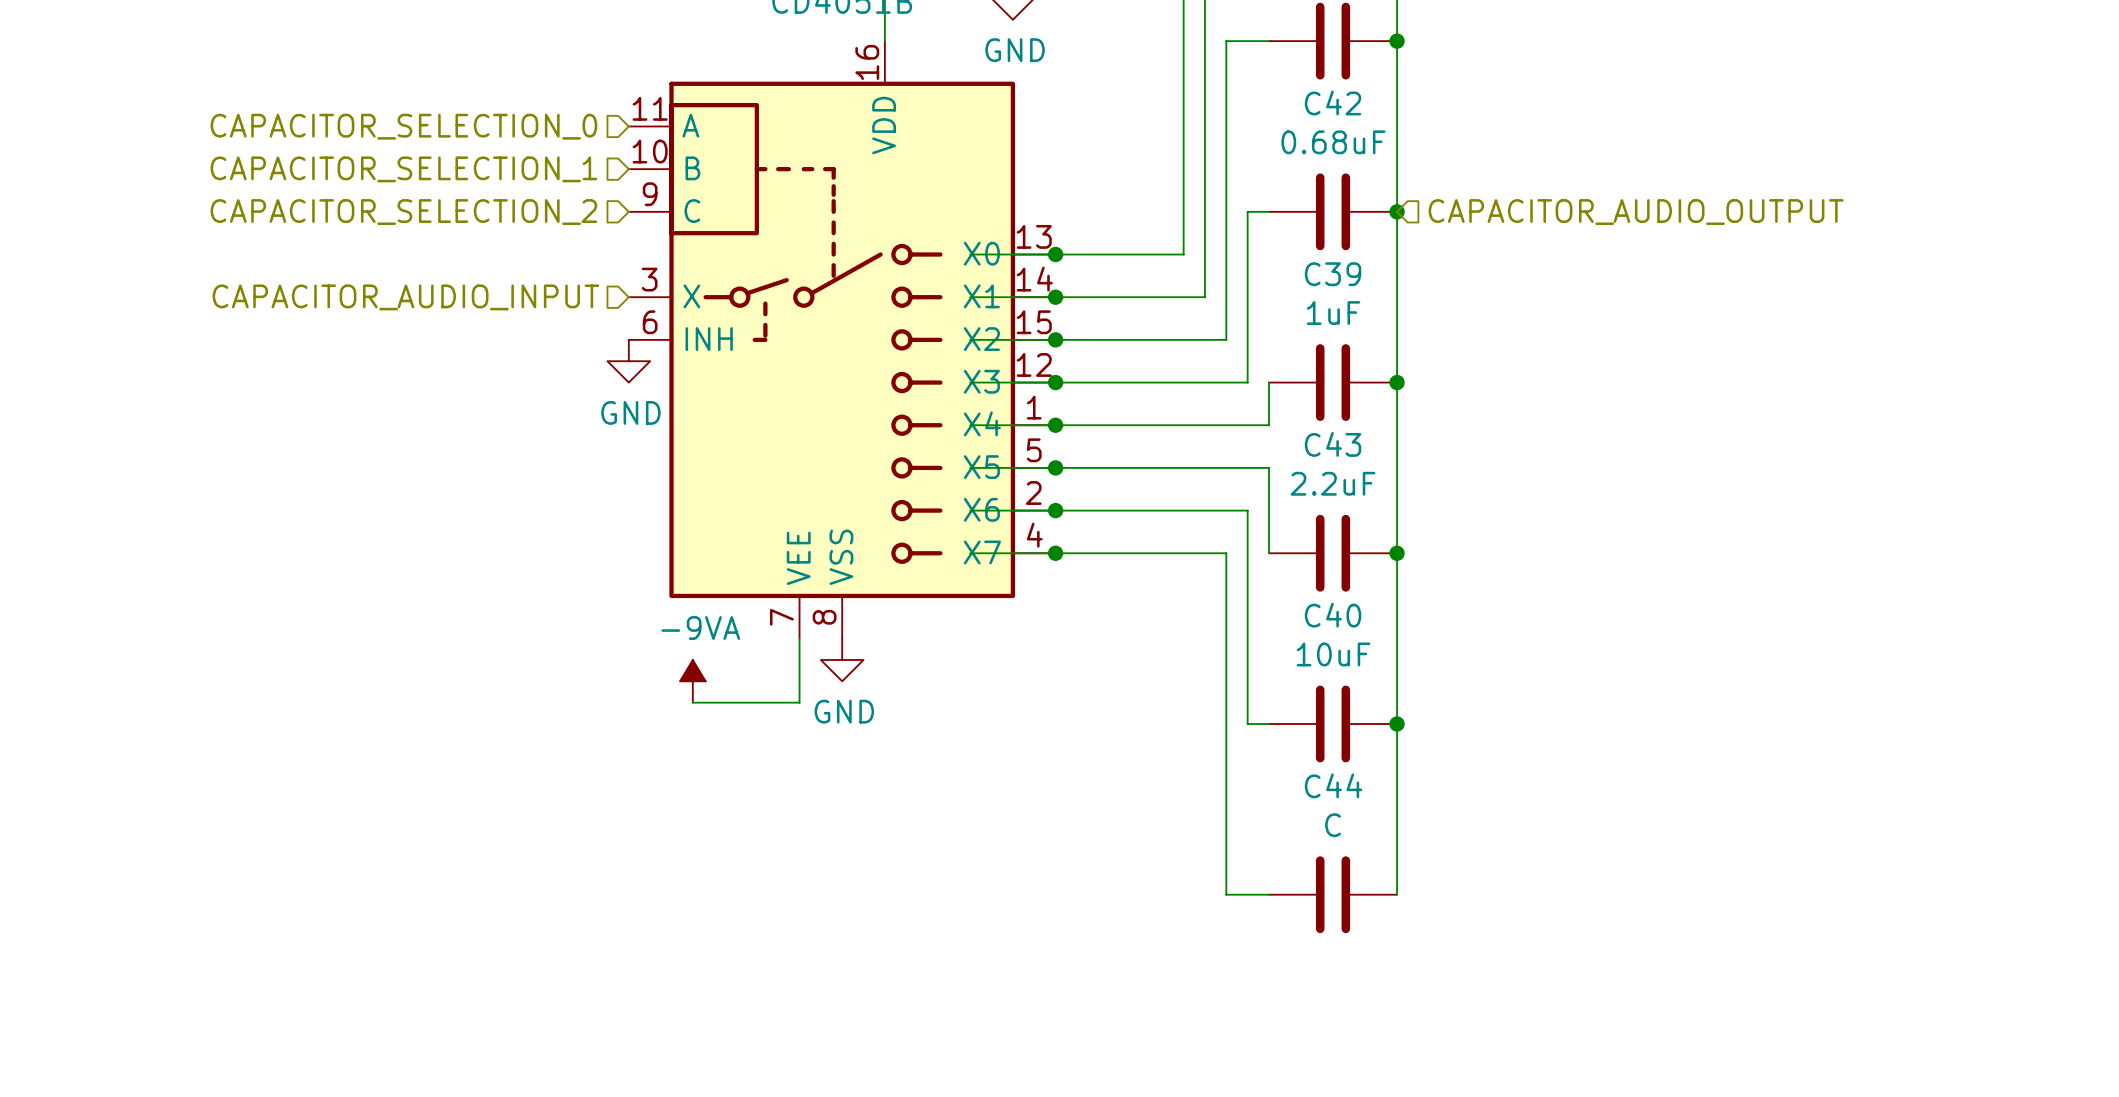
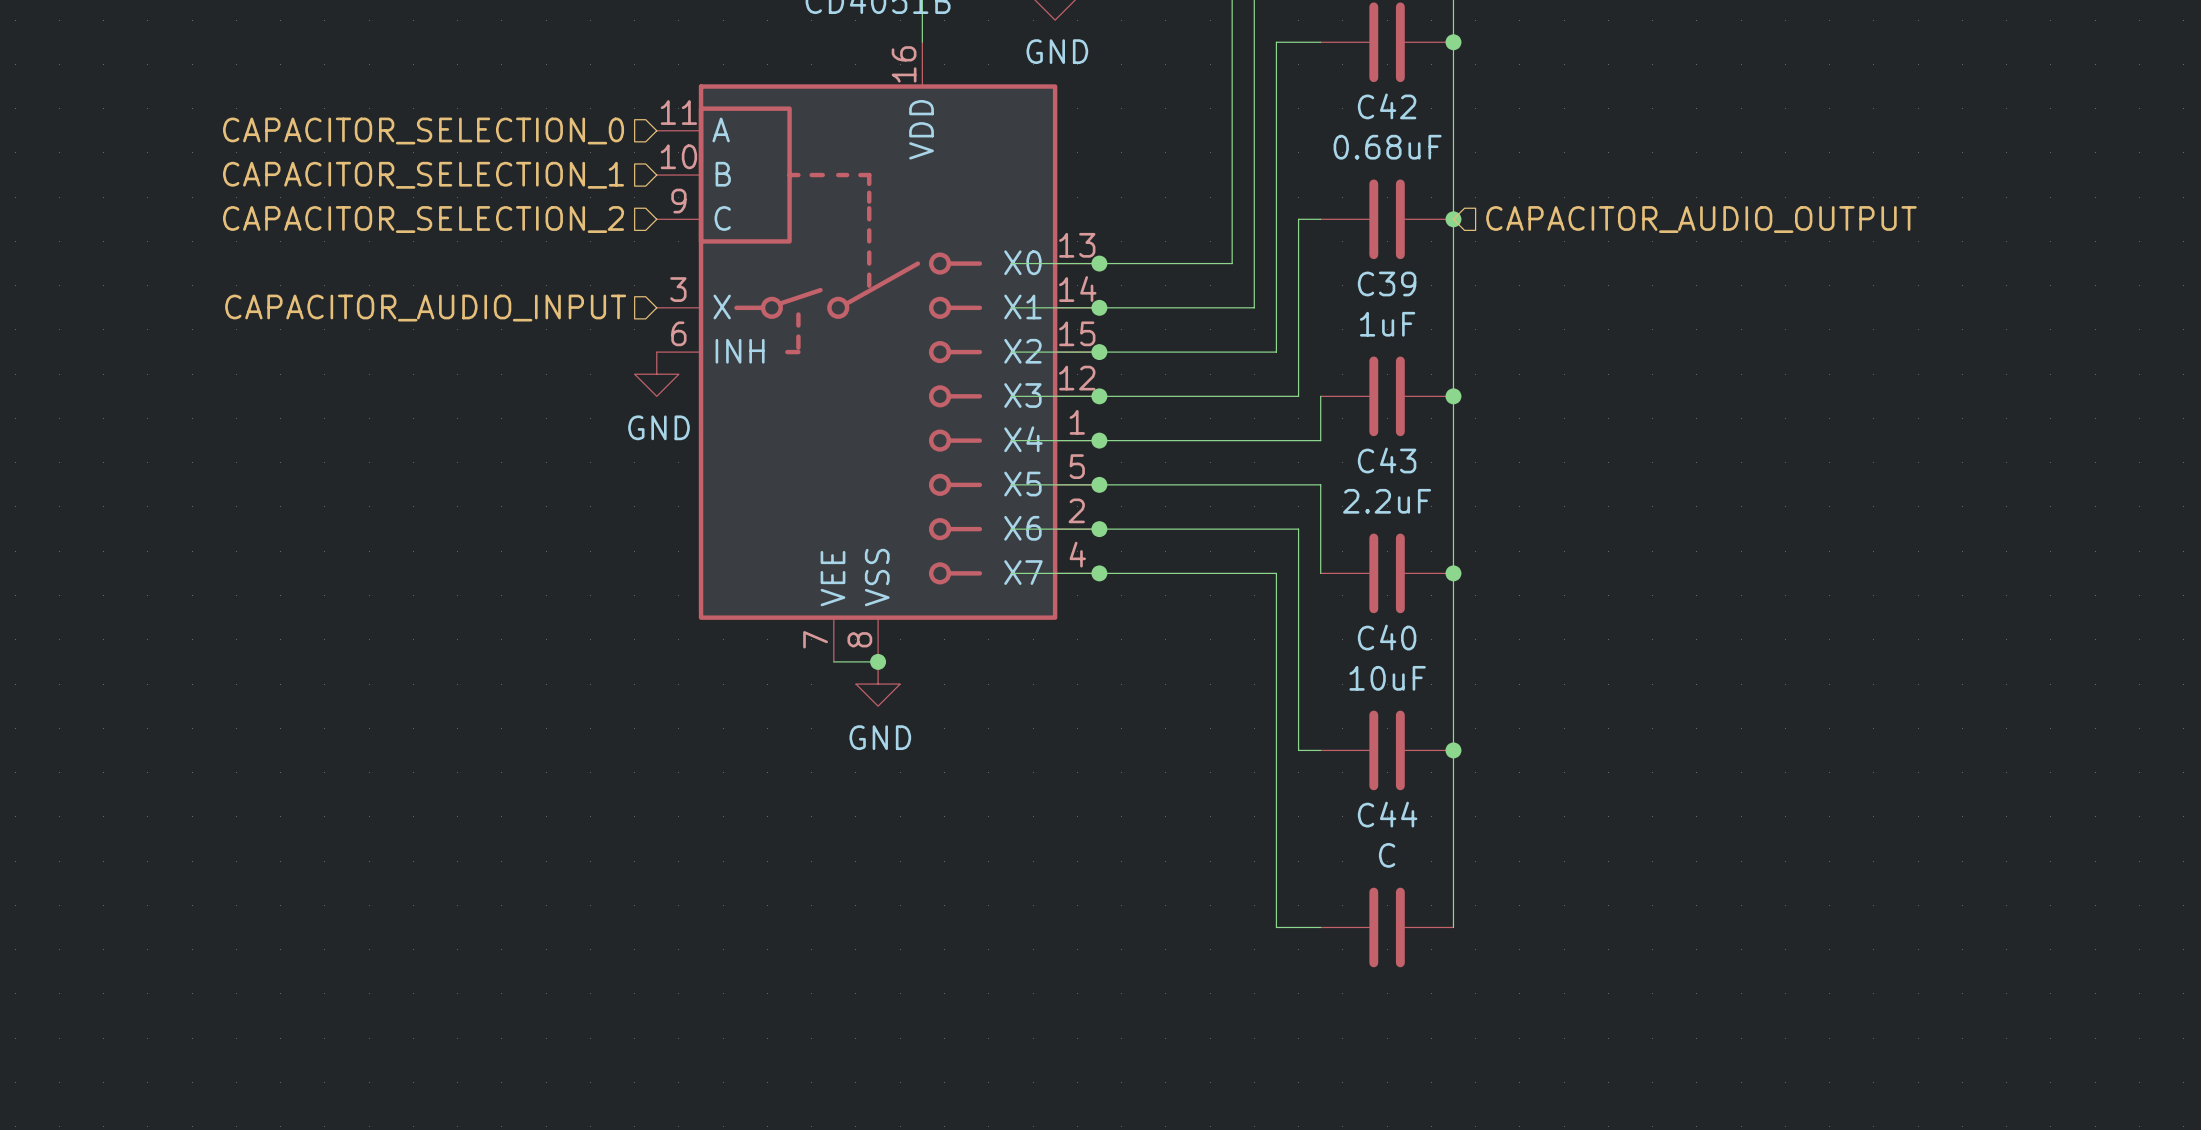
wire: (799, 638) (799, 702) (692, 702) -> (833, 661) (878, 661)
junction: none -> (878, 661)
power symbol: -9VA (692, 681) -> none

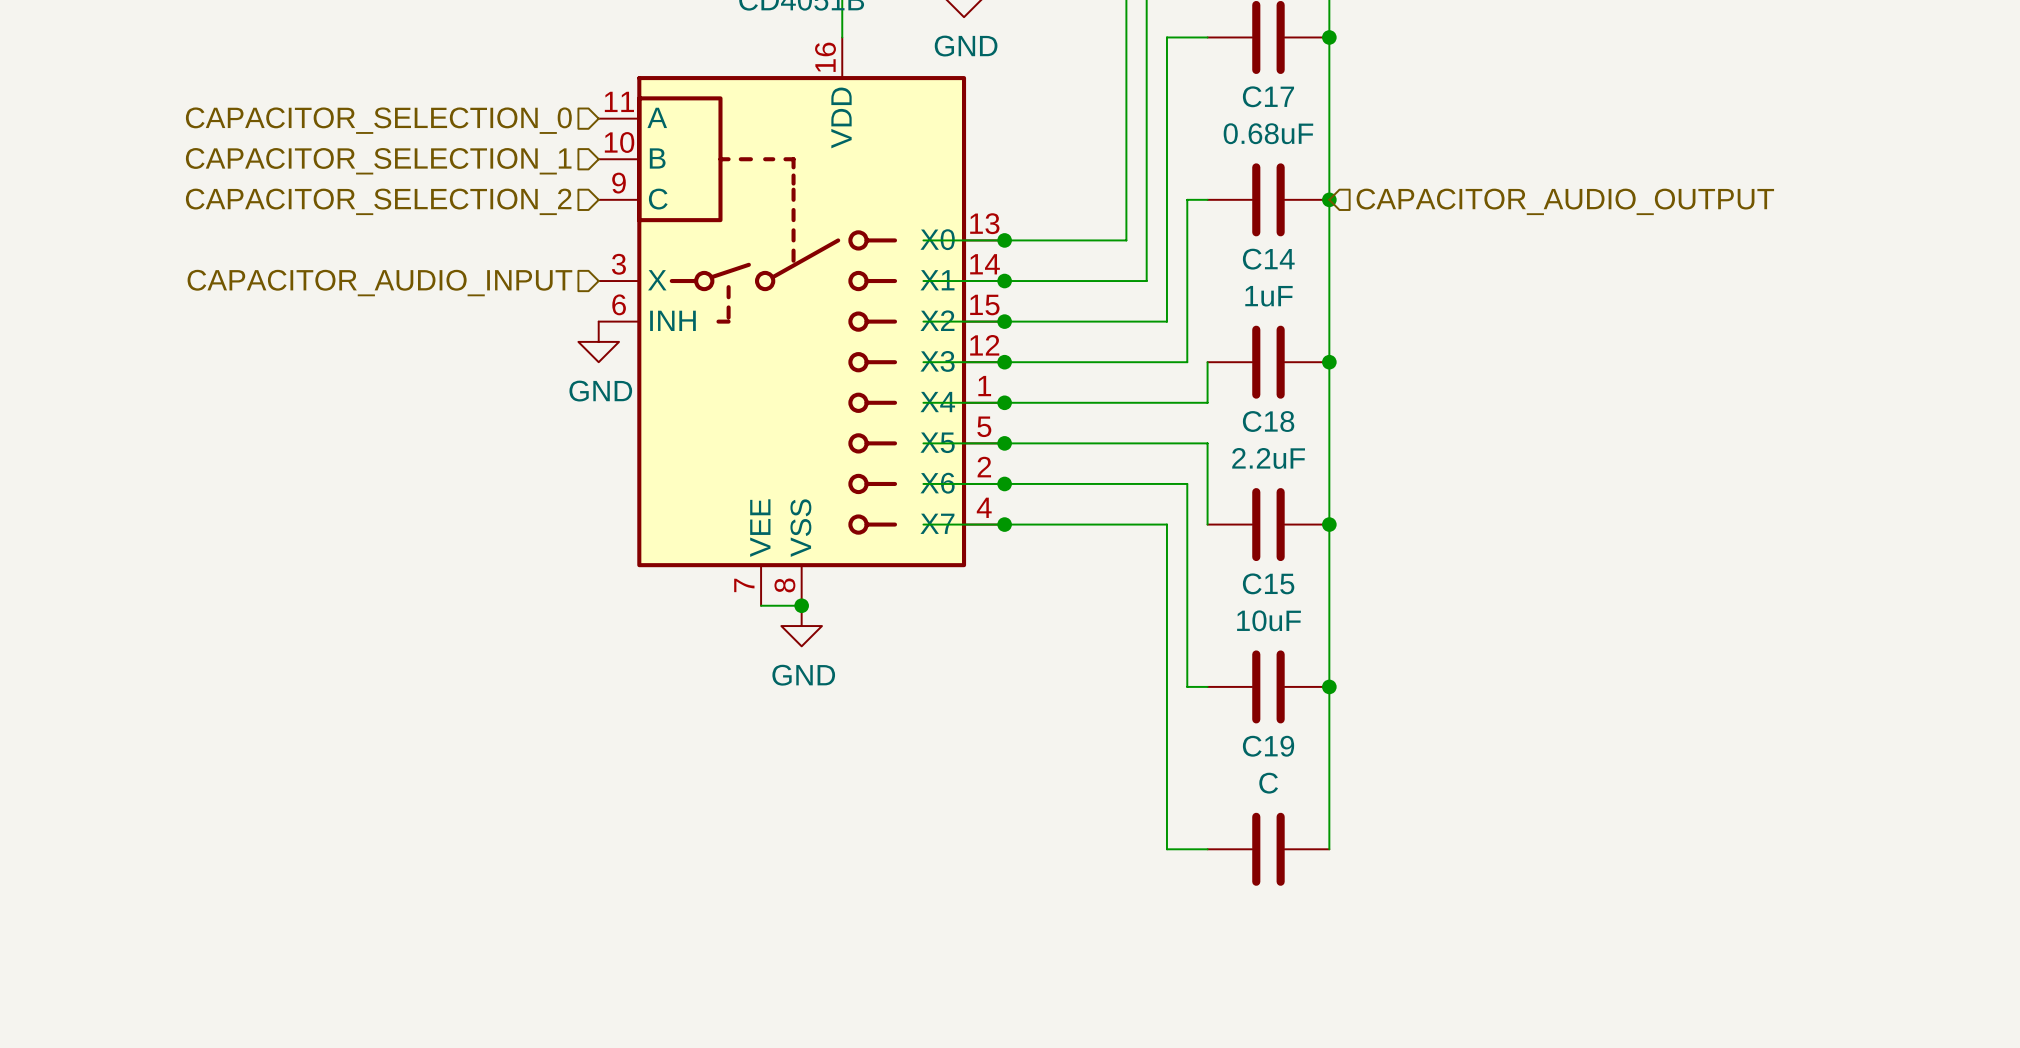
C42 name: C42 (1387, 106) -> C17 (1268, 96)
C39 name: C39 (1387, 283) -> C14 (1268, 259)
C43 name: C43 (1387, 460) -> C18 (1268, 421)
C40 name: C40 (1387, 637) -> C15 (1268, 583)
C44 name: C44 (1387, 814) -> C19 (1268, 746)

